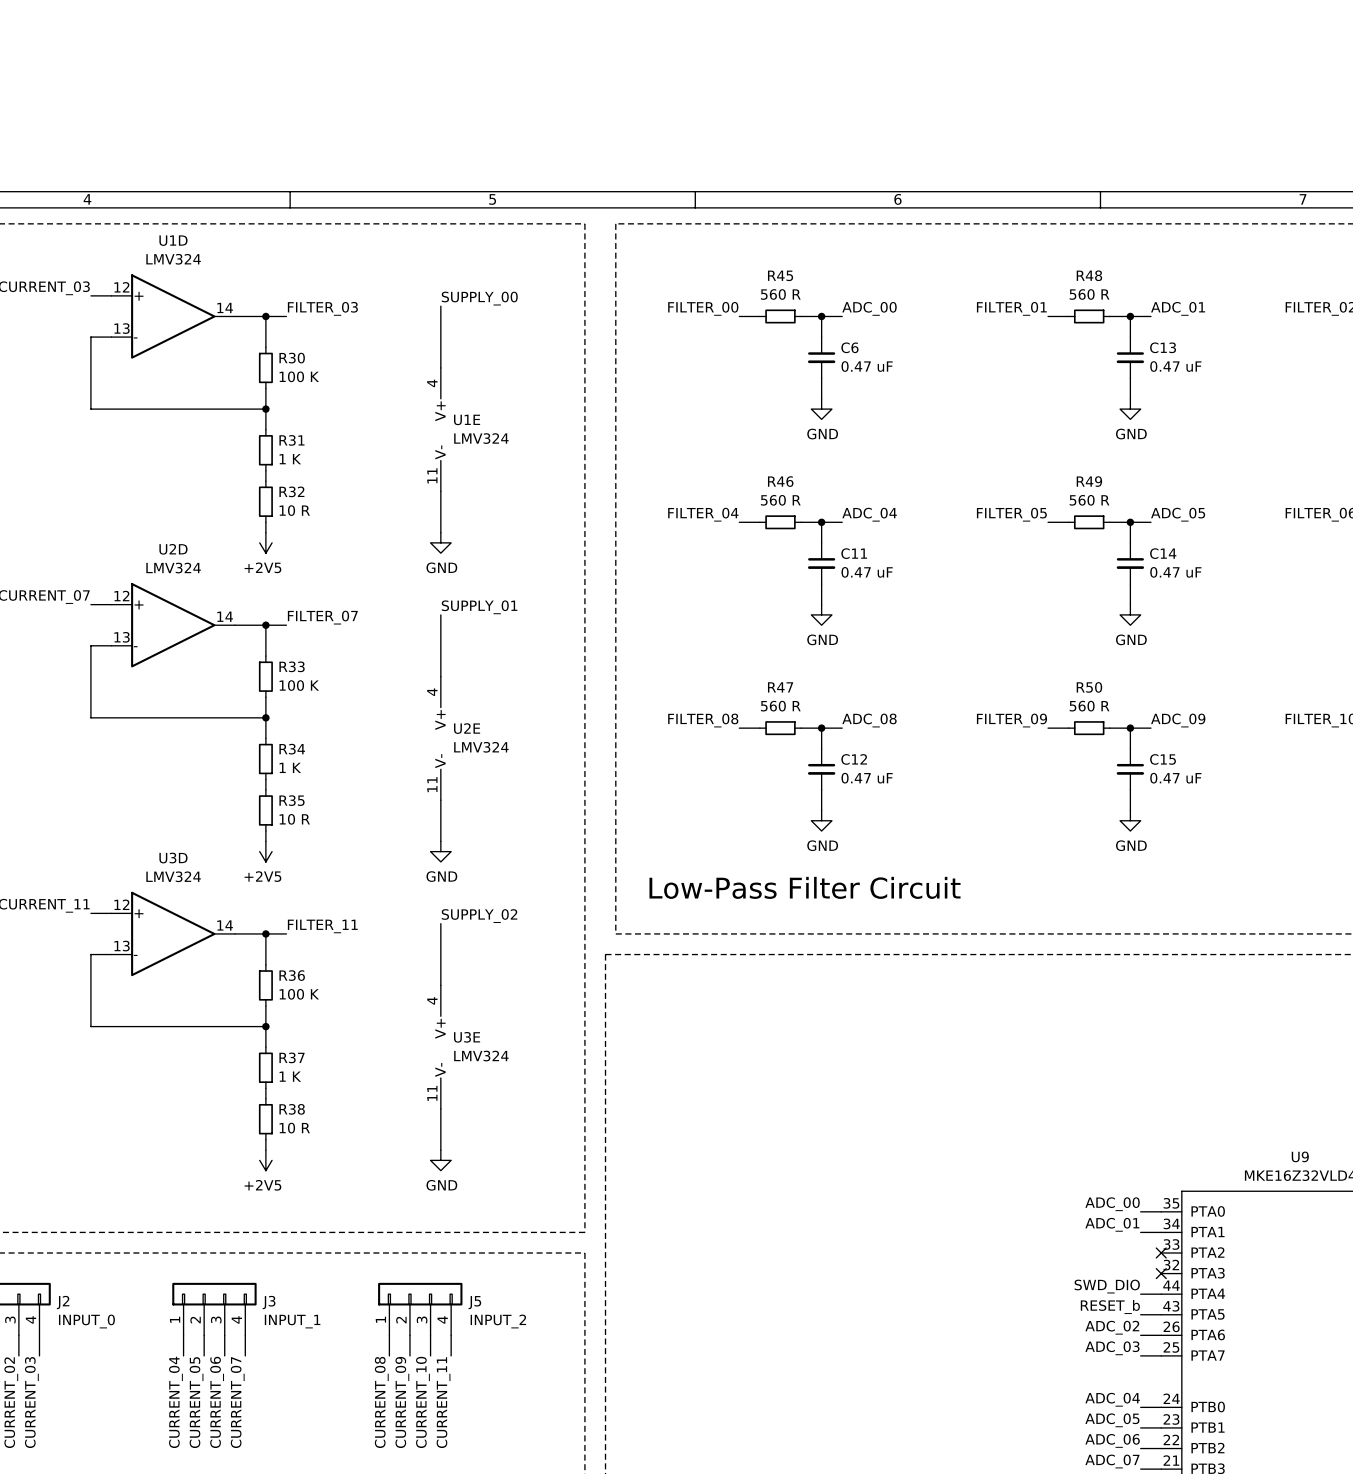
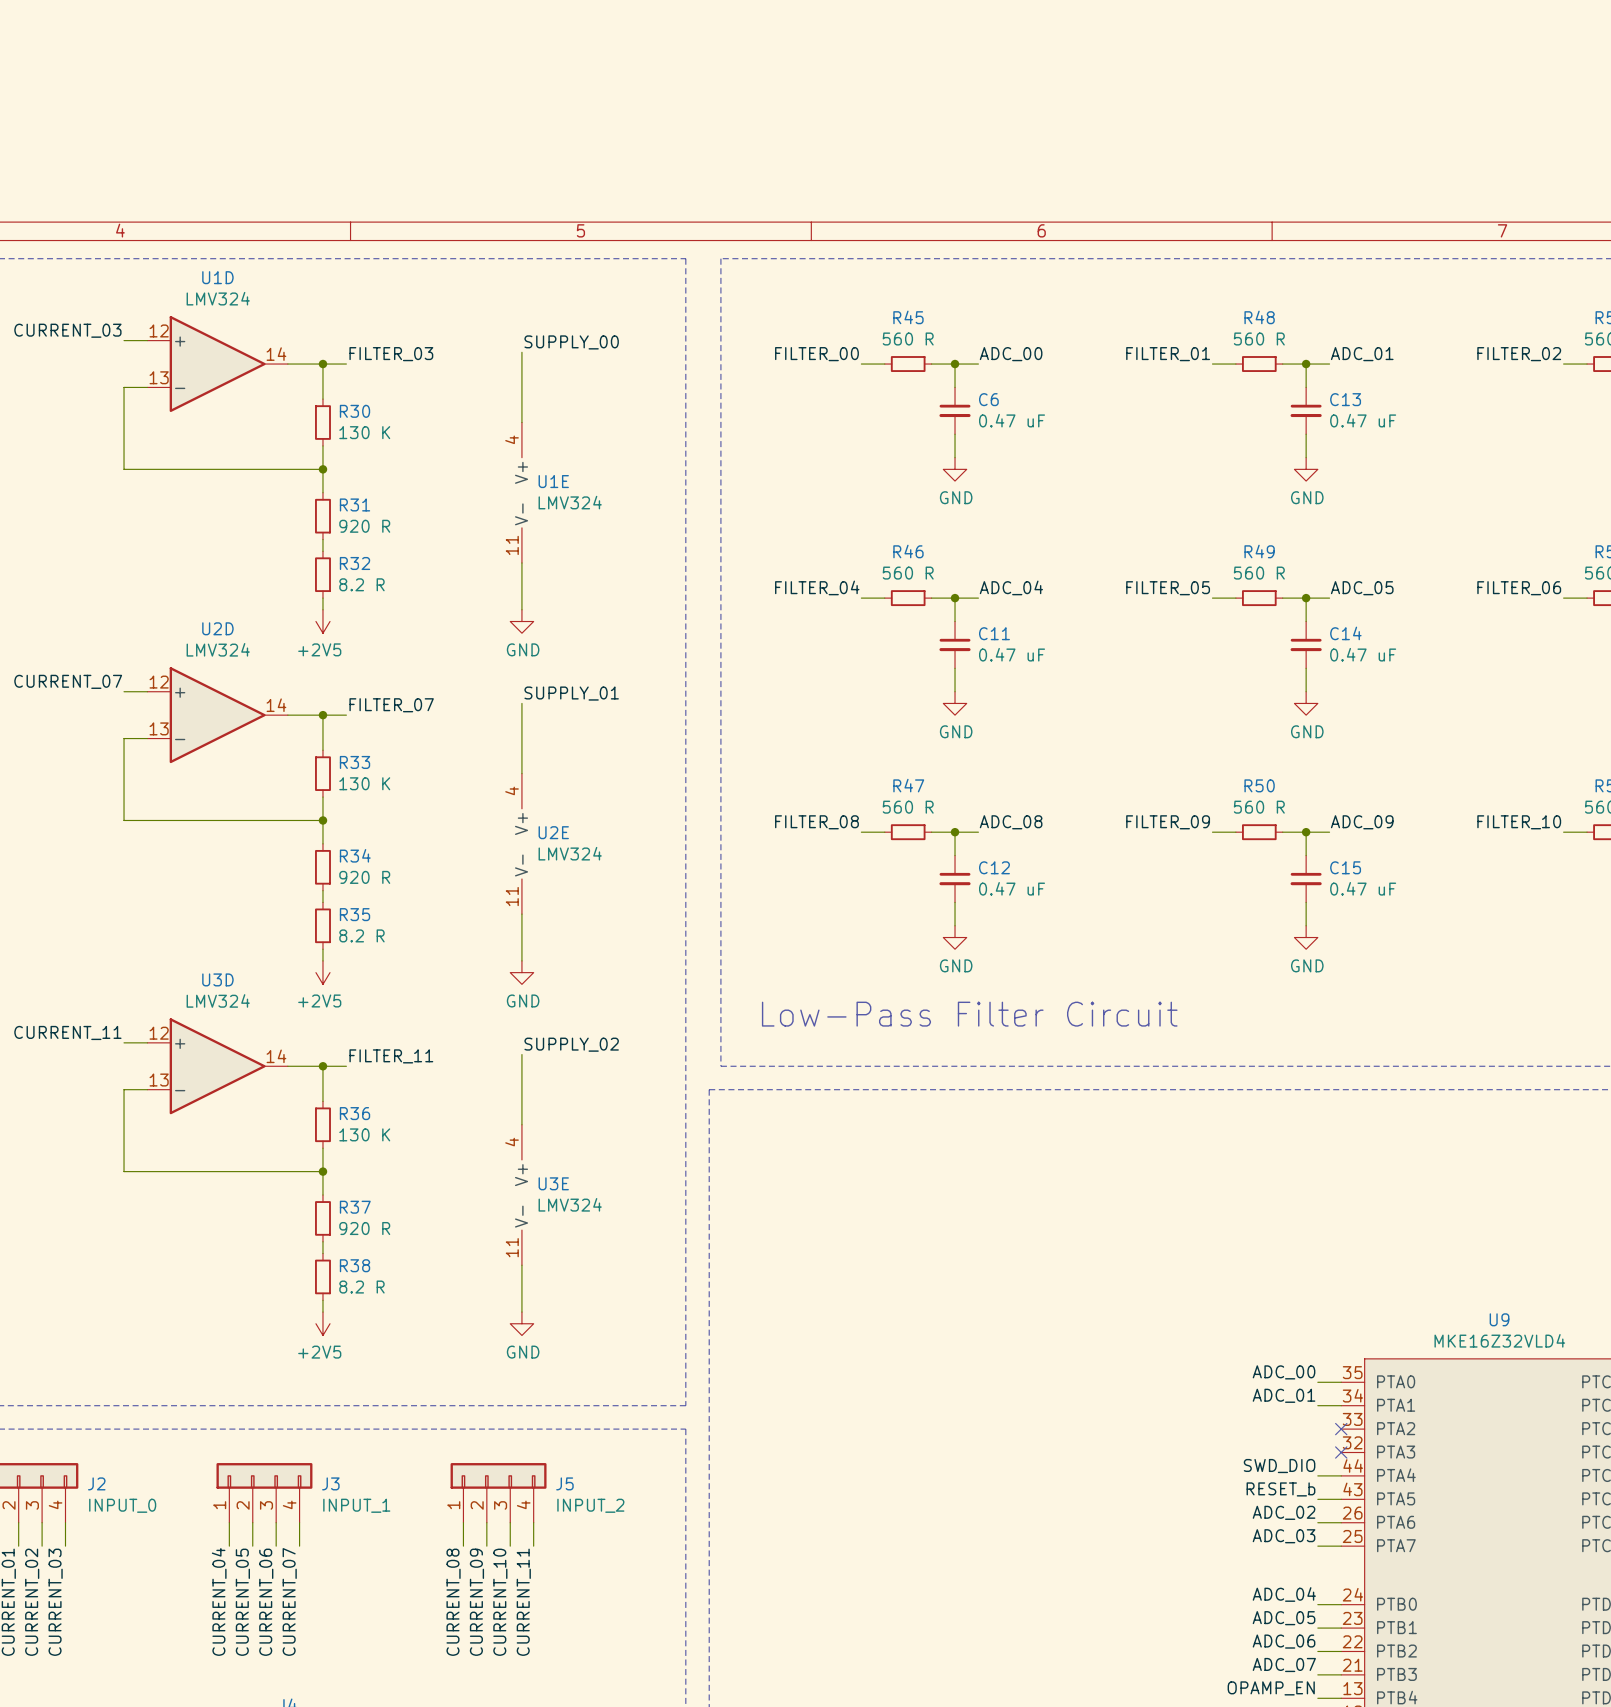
R30 value: 100 K (299, 376) -> 130 K (364, 432)
R31 value: 1 K (290, 459) -> 920 R (364, 526)
R32 value: 10 R (294, 510) -> 8.2 R (361, 584)
R33 value: 100 K (299, 685) -> 130 K (364, 783)
R34 value: 1 K (290, 767) -> 920 R (364, 877)
R35 value: 10 R (294, 819) -> 8.2 R (361, 935)
R36 value: 100 K (299, 994) -> 130 K (364, 1134)
R37 value: 1 K (290, 1076) -> 920 R (364, 1228)
R38 value: 10 R (294, 1128) -> 8.2 R (361, 1287)

